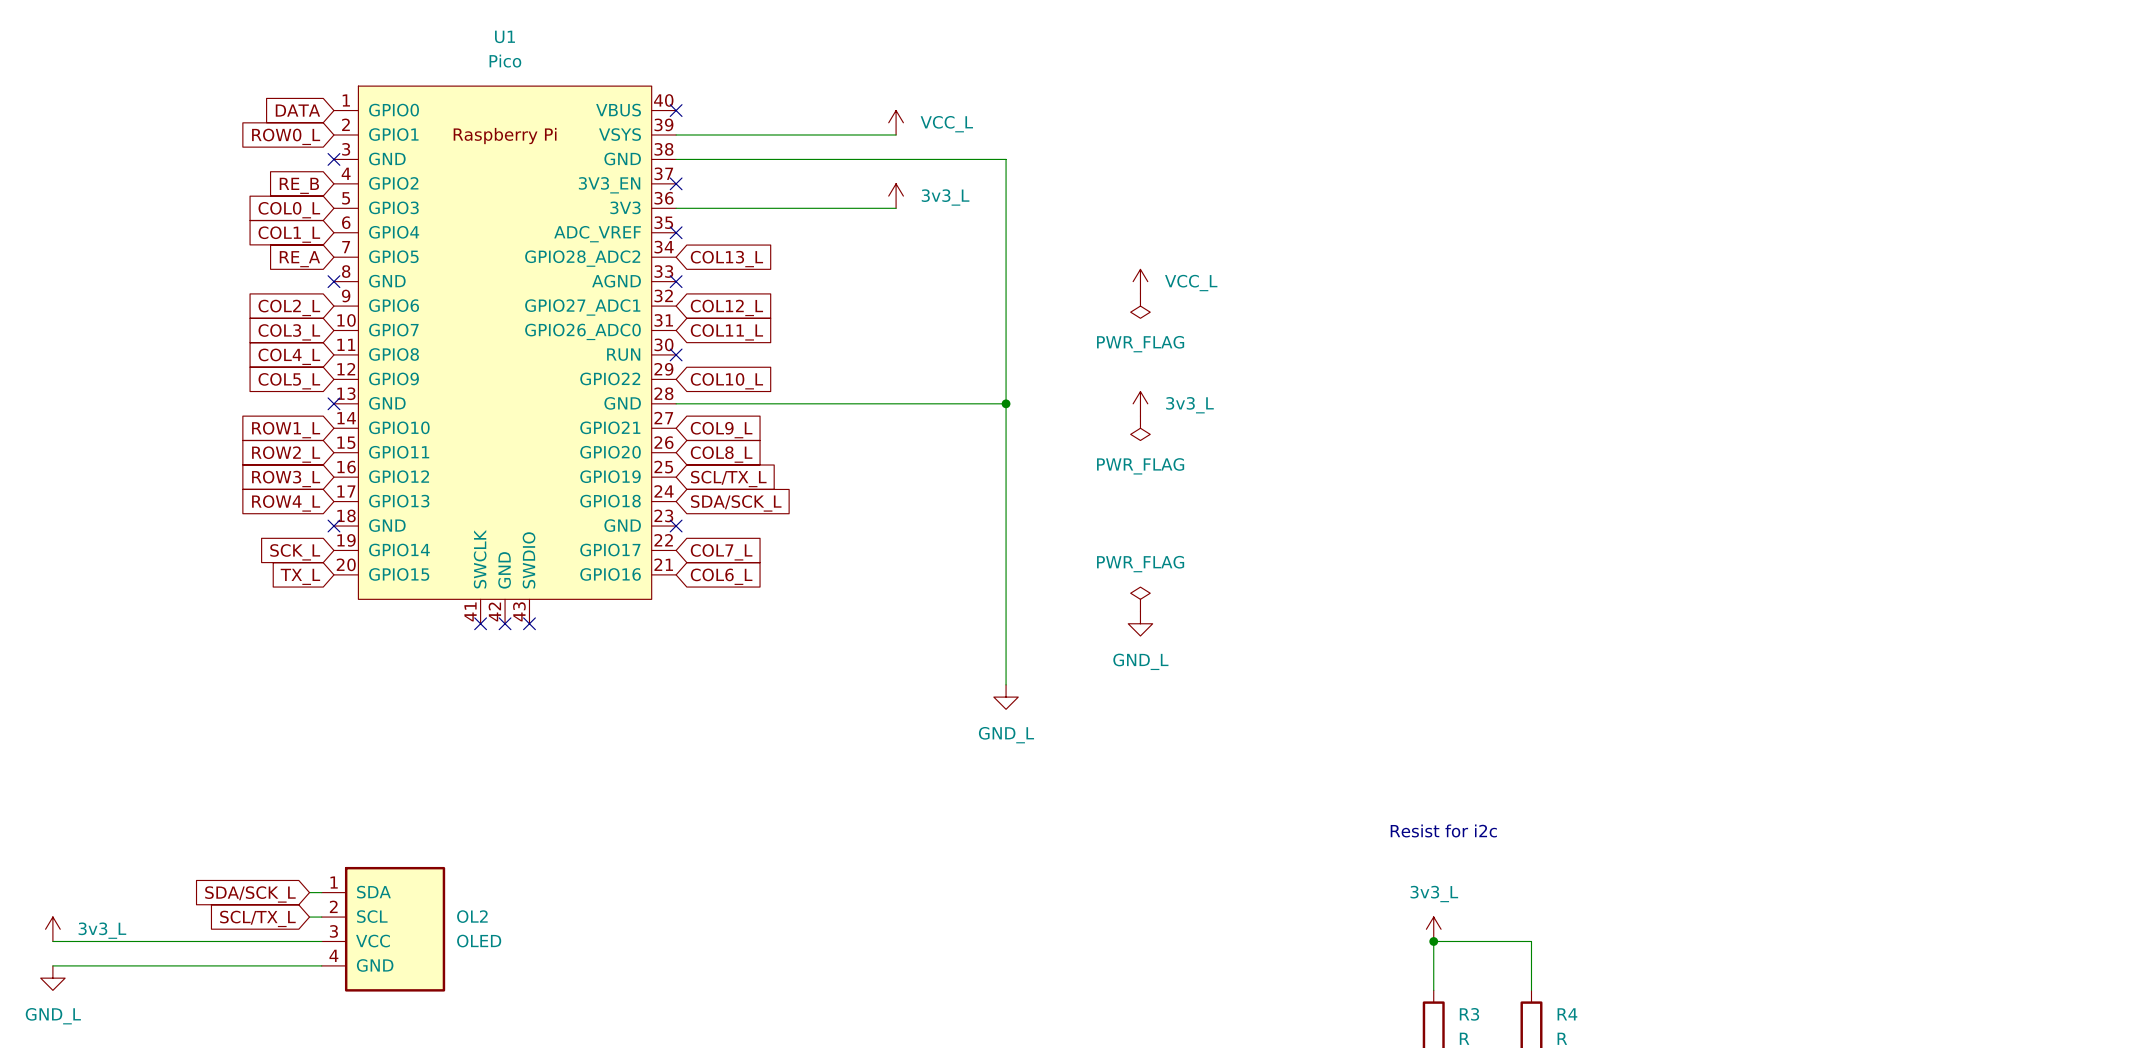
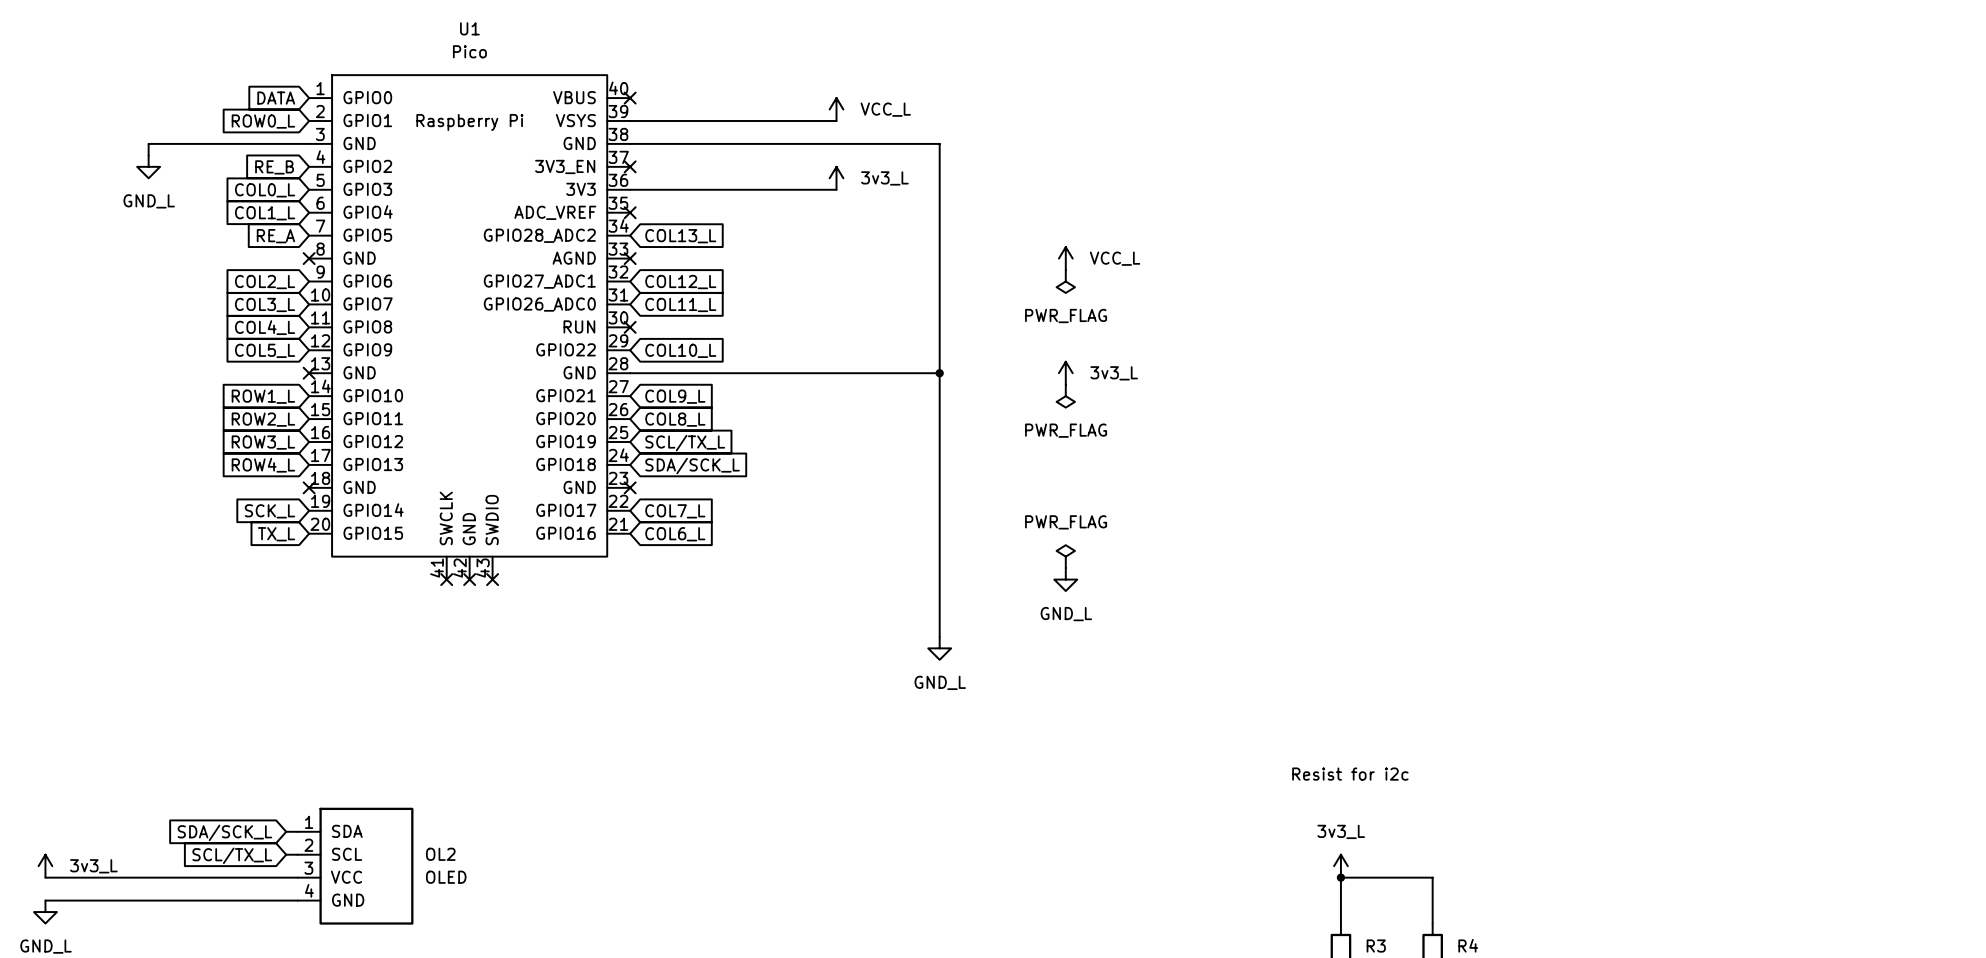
wire: none -> (309, 143) (148, 143) (148, 155)
no-connect mark: (333, 159) -> none
power symbol: none -> GND_L (148, 166)

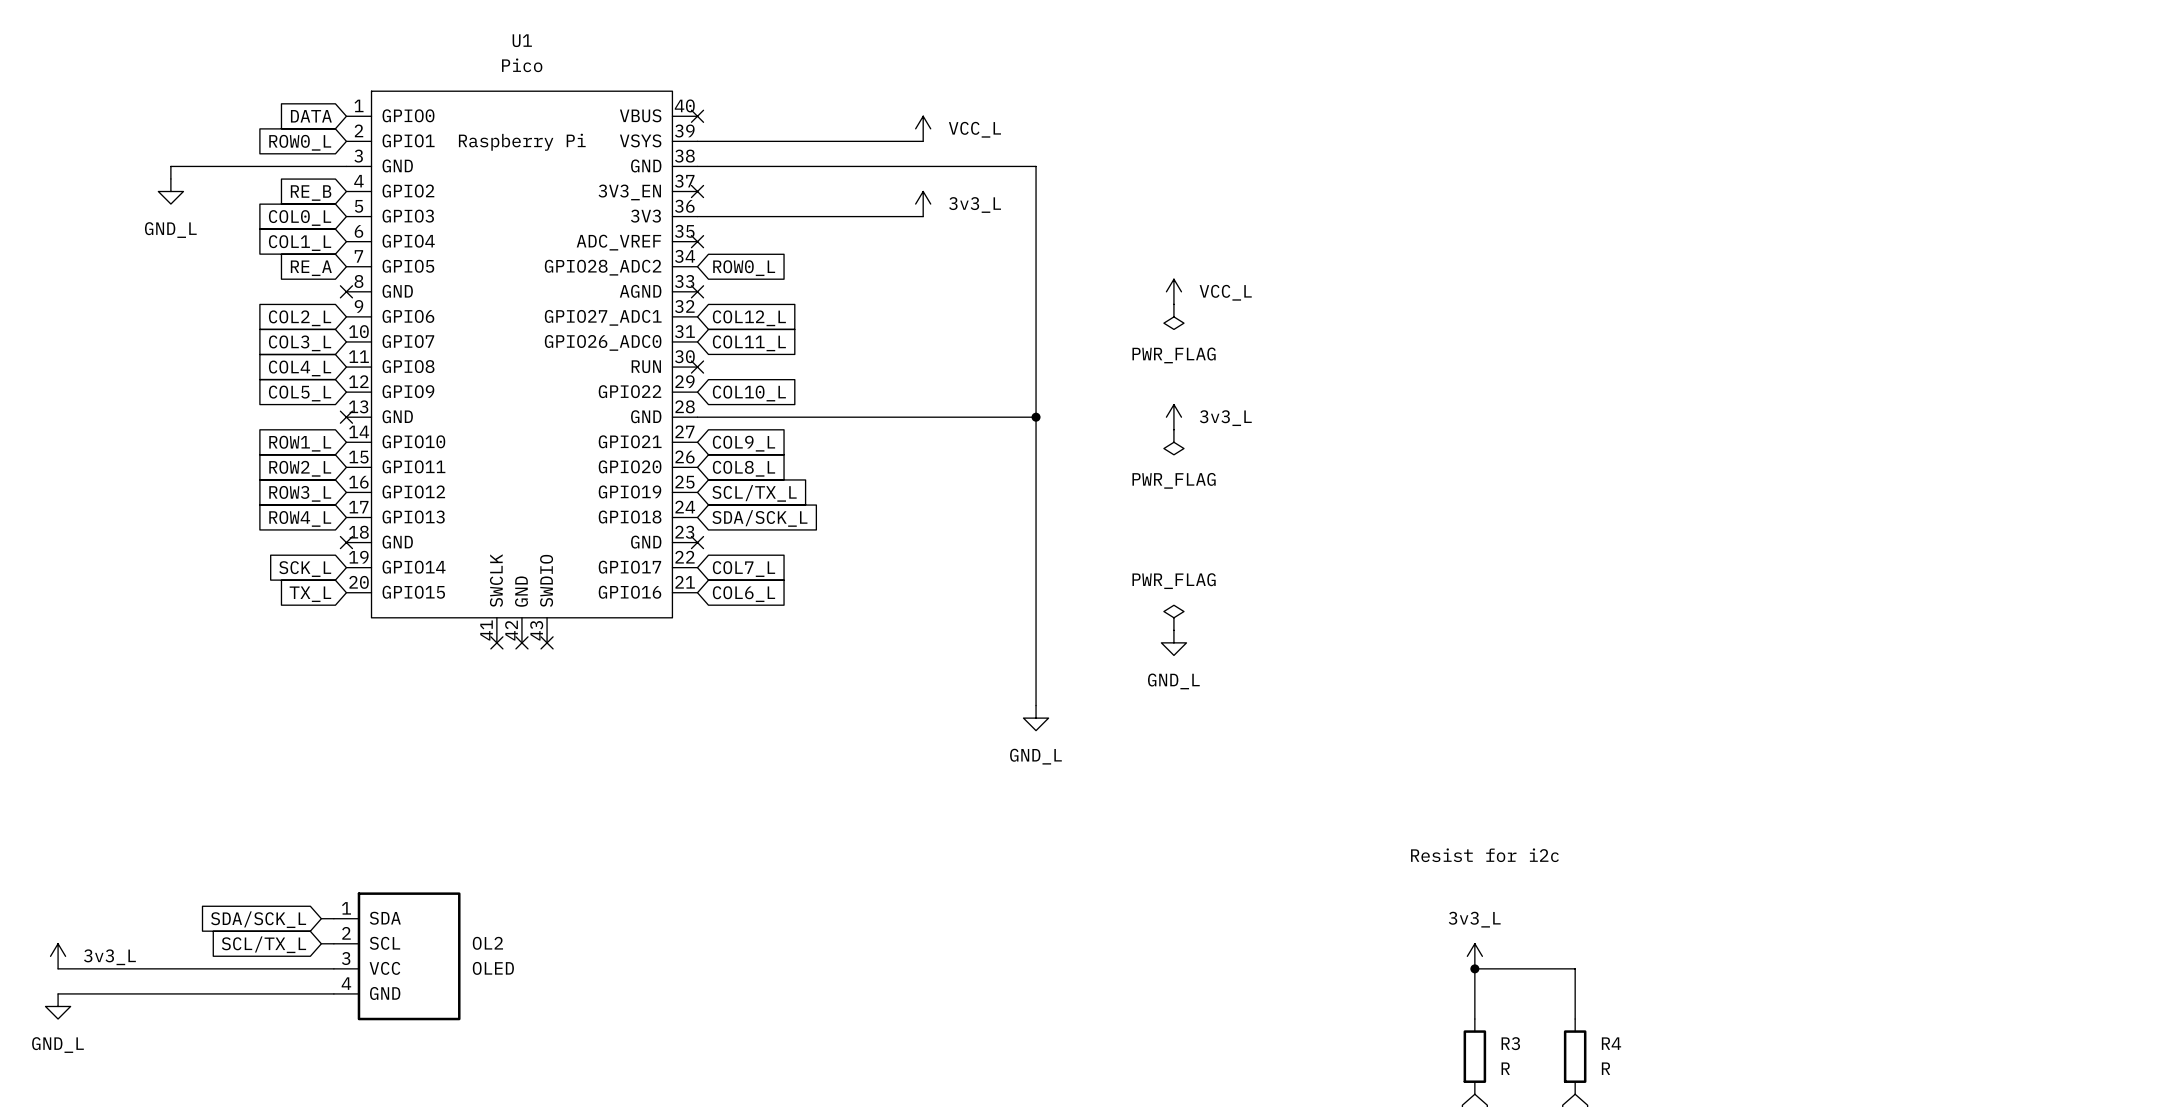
global label: COL13_L (680, 236) -> ROW0_L (744, 268)

